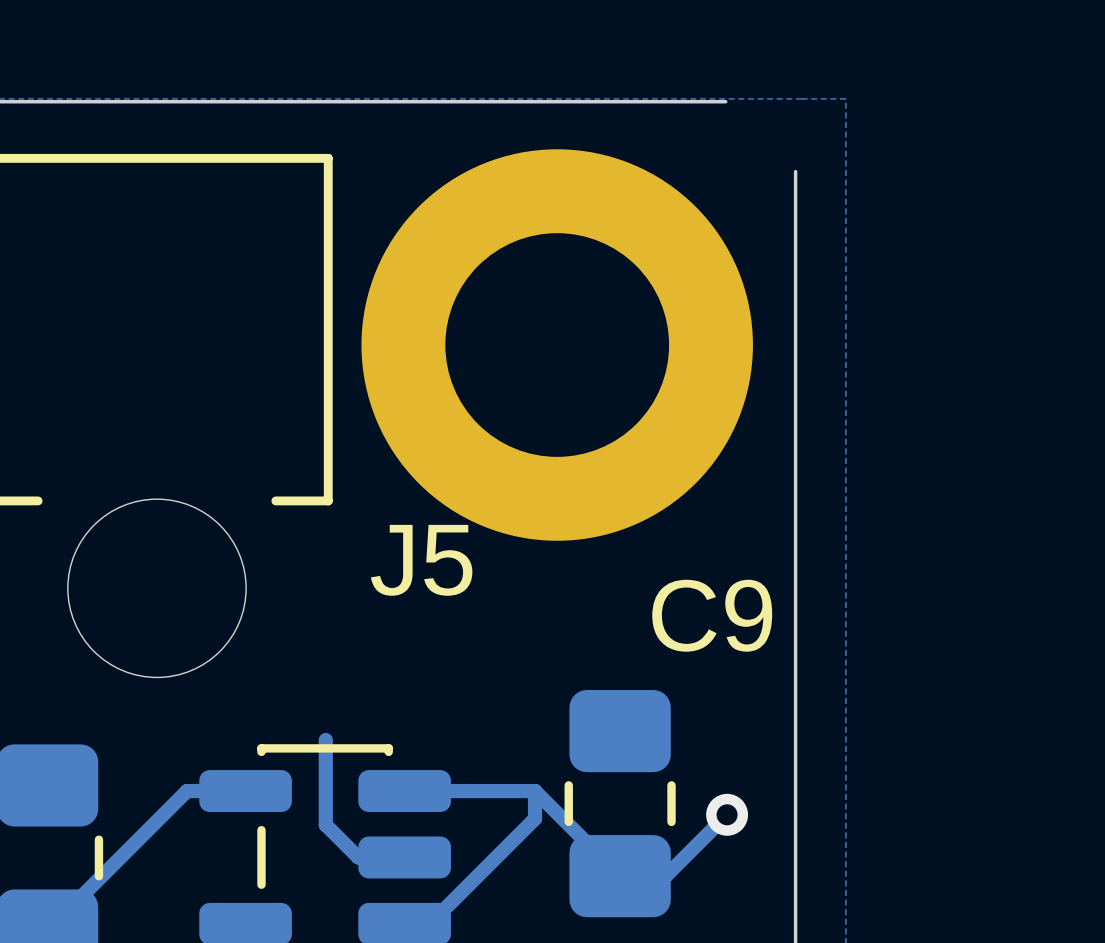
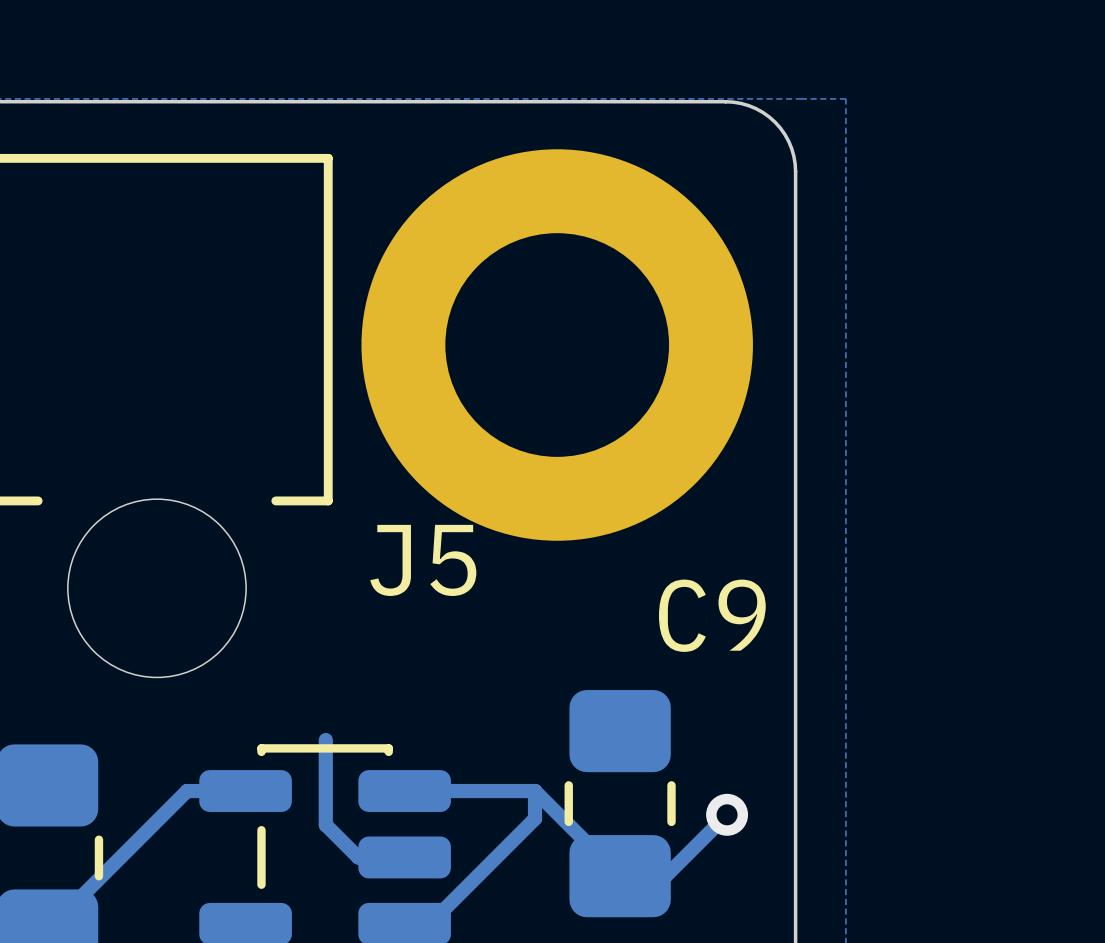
board edge: none -> (725, 101) (748, 105) (762, 112) (775, 122) (788, 141) (793, 156) (795, 171)

